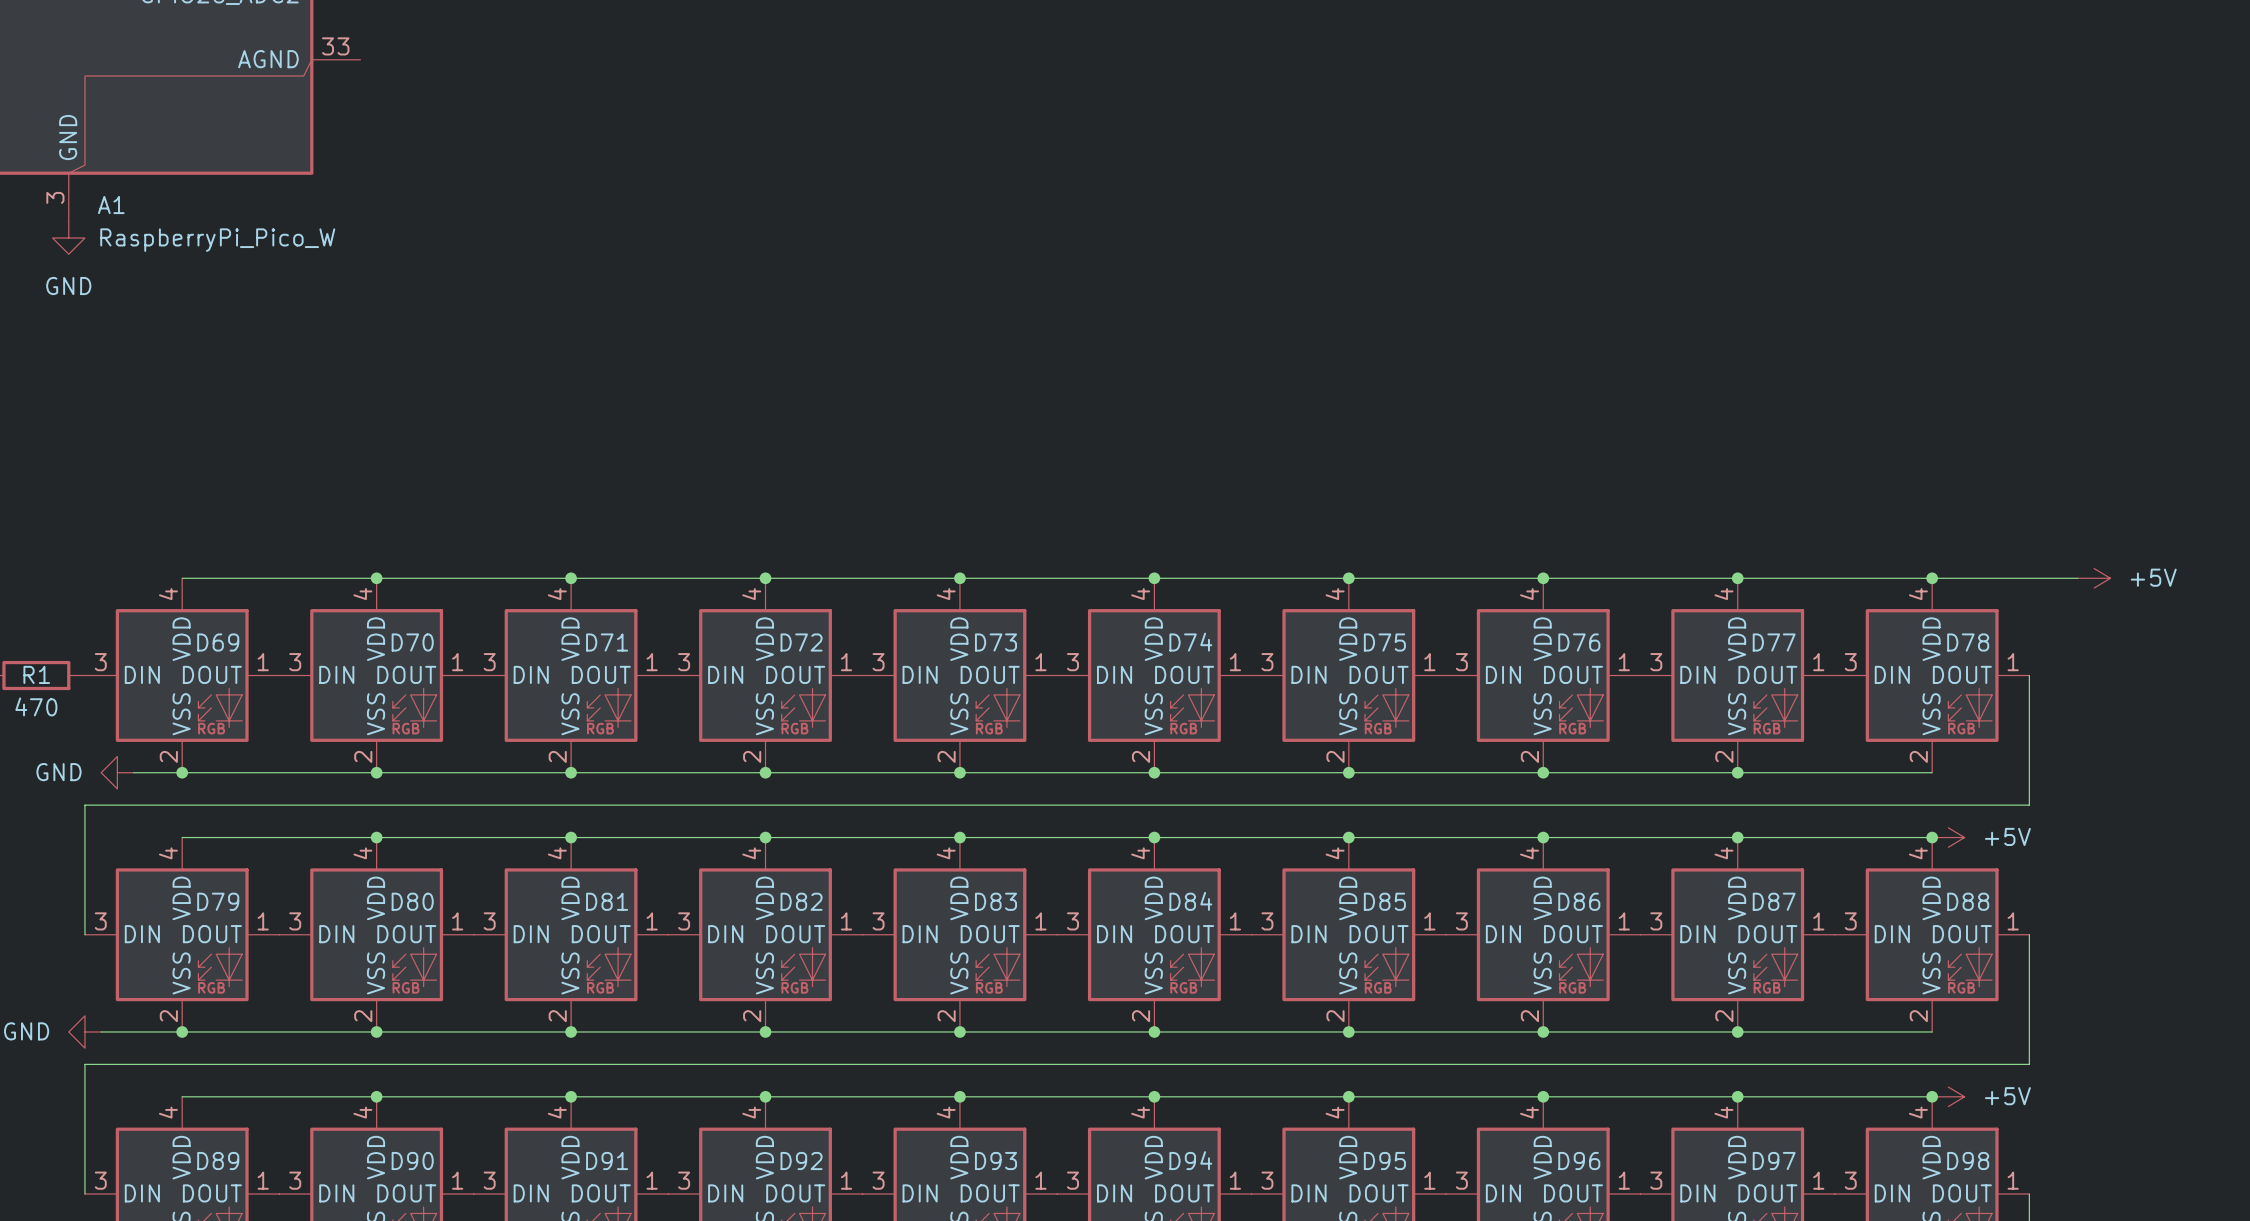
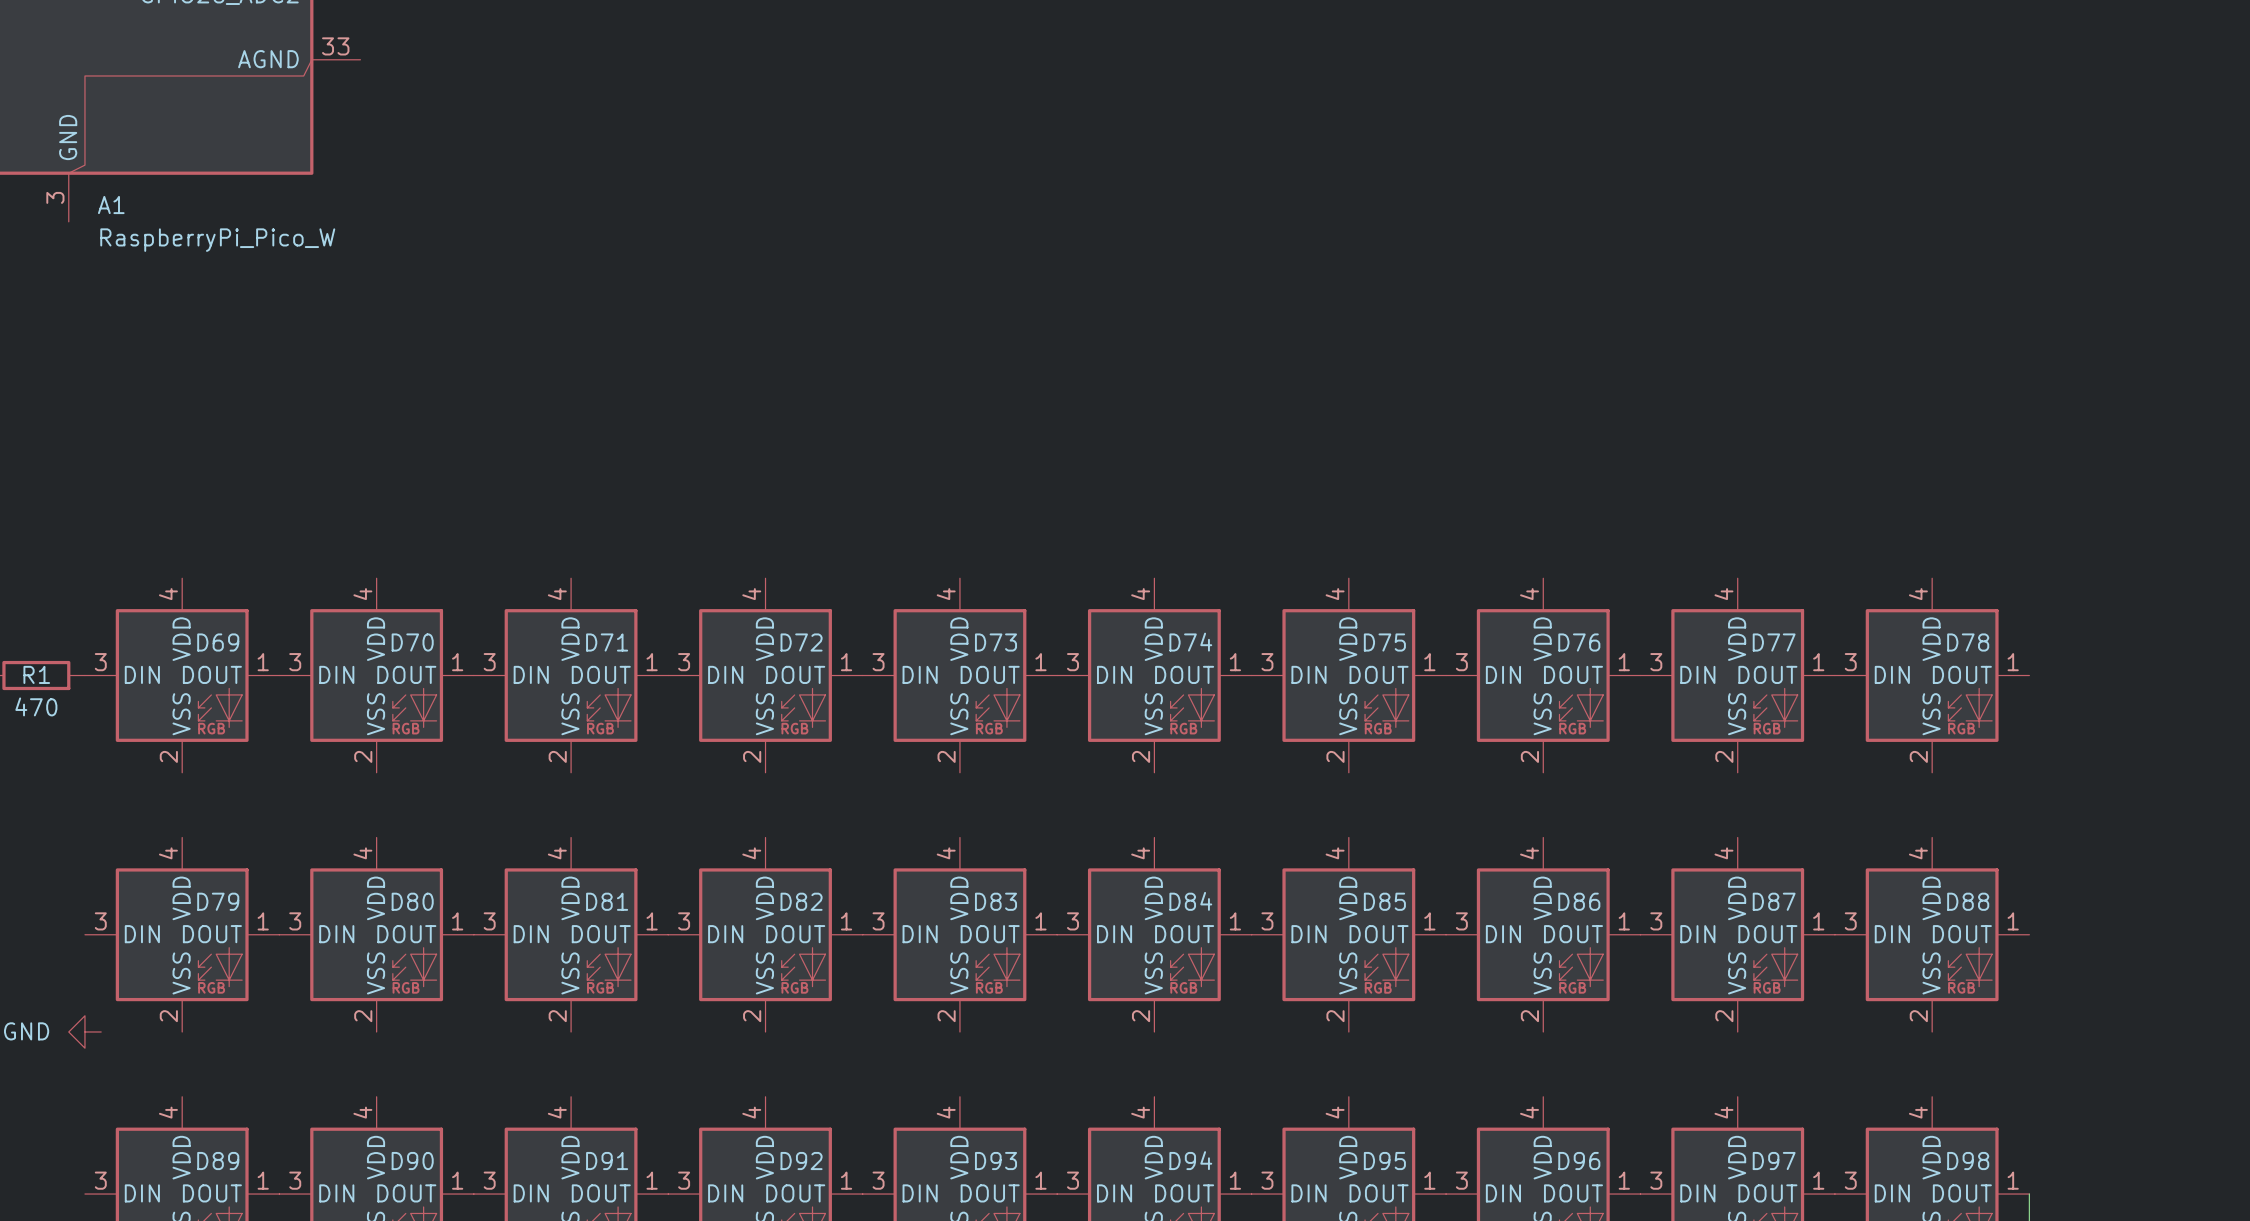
power symbol: GND (68, 238) -> none
wire: (182, 578) (2077, 578) -> none
junction: (376, 578) -> none
junction: (571, 578) -> none
junction: (765, 578) -> none
junction: (959, 578) -> none
junction: (1154, 578) -> none
junction: (1348, 578) -> none
junction: (1543, 578) -> none
junction: (1737, 578) -> none
junction: (1932, 578) -> none
power symbol: +5V (2094, 578) -> none
wire: (2029, 675) (2029, 805) (84, 805) (84, 934) -> none
power symbol: GND (117, 772) -> none
wire: (133, 772) (1932, 772) -> none
junction: (182, 772) -> none
junction: (376, 772) -> none
junction: (571, 772) -> none
junction: (765, 772) -> none
junction: (959, 772) -> none
junction: (1154, 772) -> none
junction: (1348, 772) -> none
junction: (1543, 772) -> none
junction: (1737, 772) -> none
wire: (182, 837) (1932, 837) -> none
junction: (376, 837) -> none
junction: (571, 837) -> none
junction: (765, 837) -> none
junction: (959, 837) -> none
junction: (1154, 837) -> none
junction: (1348, 837) -> none
junction: (1543, 837) -> none
junction: (1737, 837) -> none
junction: (1932, 837) -> none
power symbol: +5V (1948, 837) -> none
wire: (2029, 934) (2029, 1064) (84, 1064) (84, 1194) -> none
wire: (101, 1031) (1932, 1031) -> none
junction: (182, 1031) -> none
junction: (376, 1031) -> none
junction: (571, 1031) -> none
junction: (765, 1031) -> none
junction: (959, 1031) -> none
junction: (1154, 1031) -> none
junction: (1348, 1031) -> none
junction: (1543, 1031) -> none
junction: (1737, 1031) -> none
wire: (182, 1096) (1932, 1096) -> none
junction: (376, 1096) -> none
junction: (571, 1096) -> none
junction: (765, 1096) -> none
junction: (959, 1096) -> none
junction: (1154, 1096) -> none
junction: (1348, 1096) -> none
junction: (1543, 1096) -> none
junction: (1737, 1096) -> none
junction: (1932, 1096) -> none
power symbol: +5V (1948, 1096) -> none

